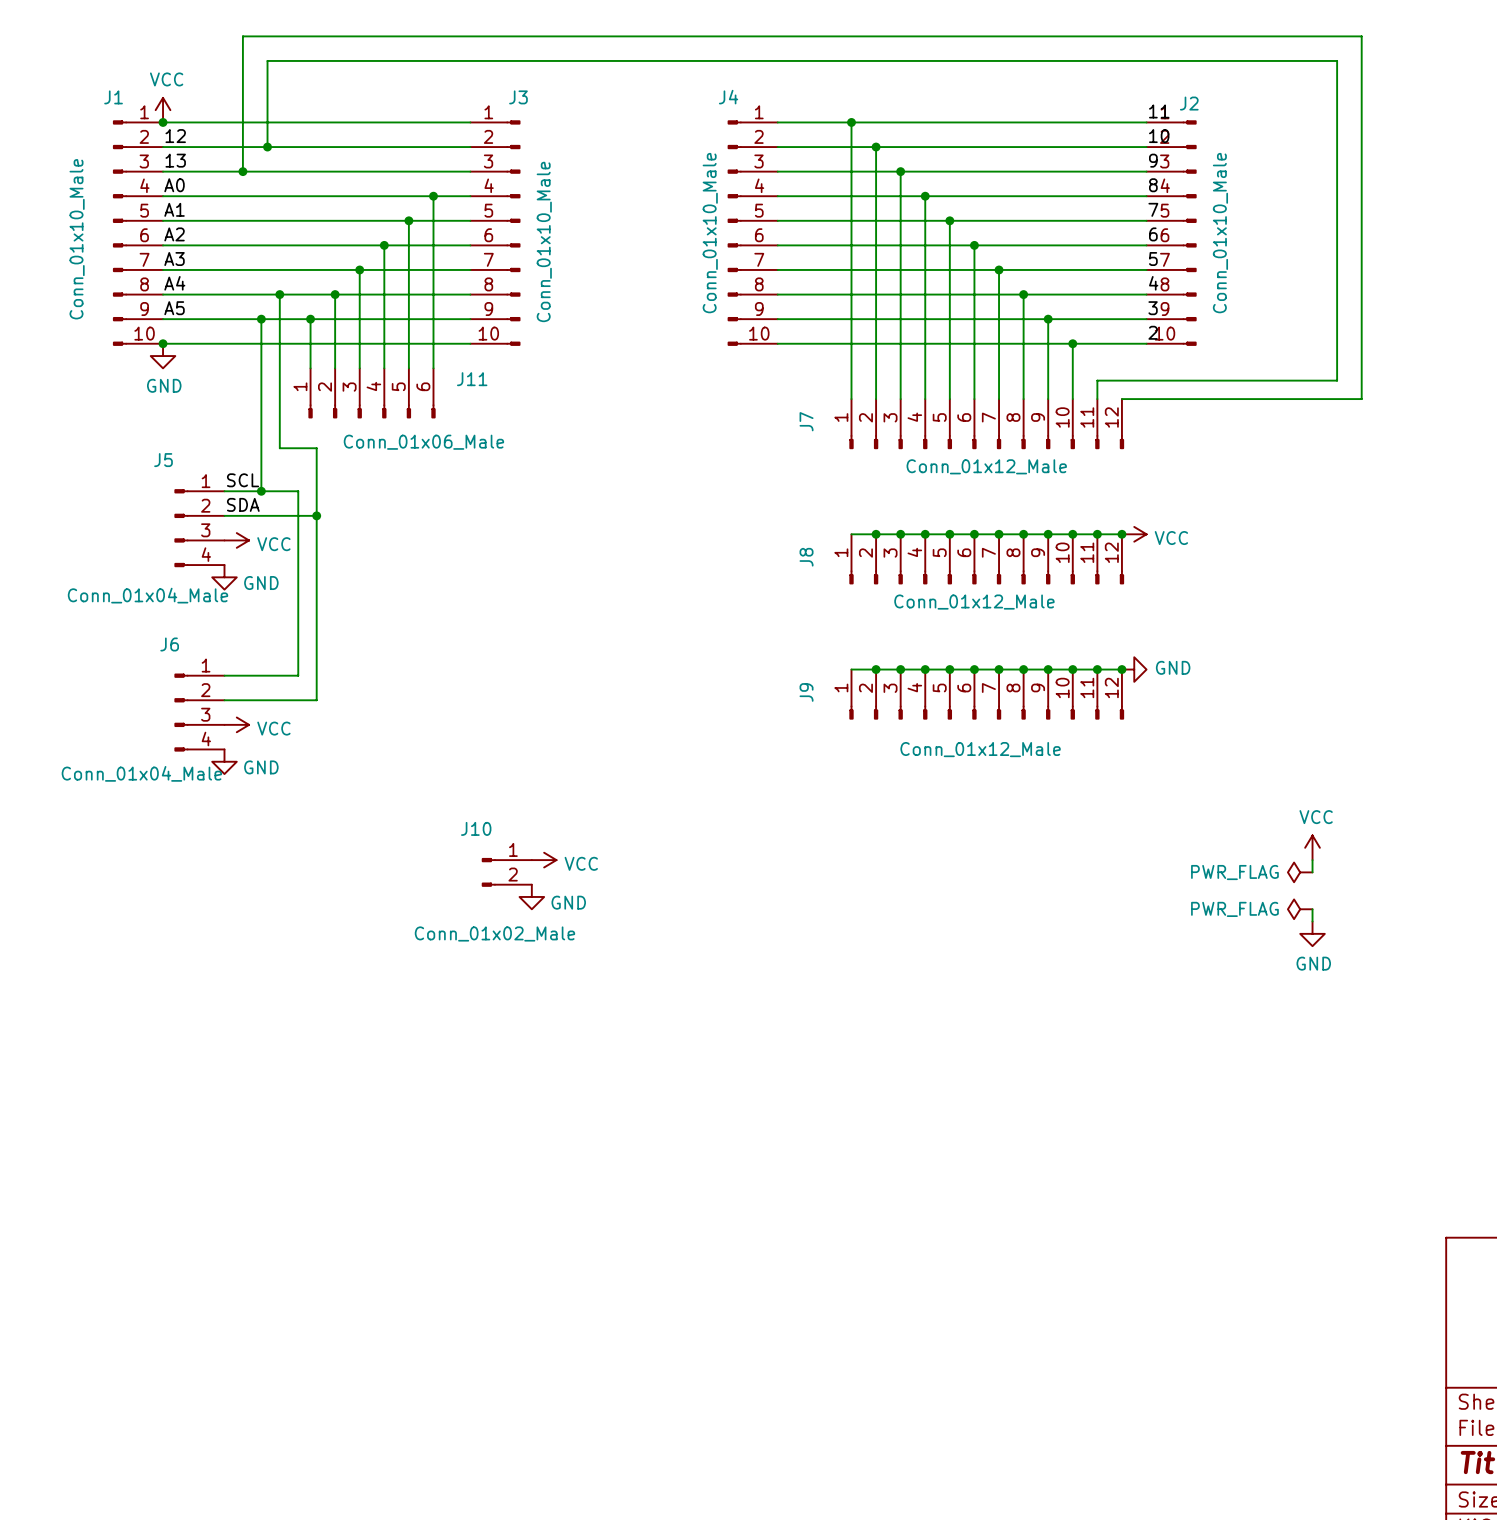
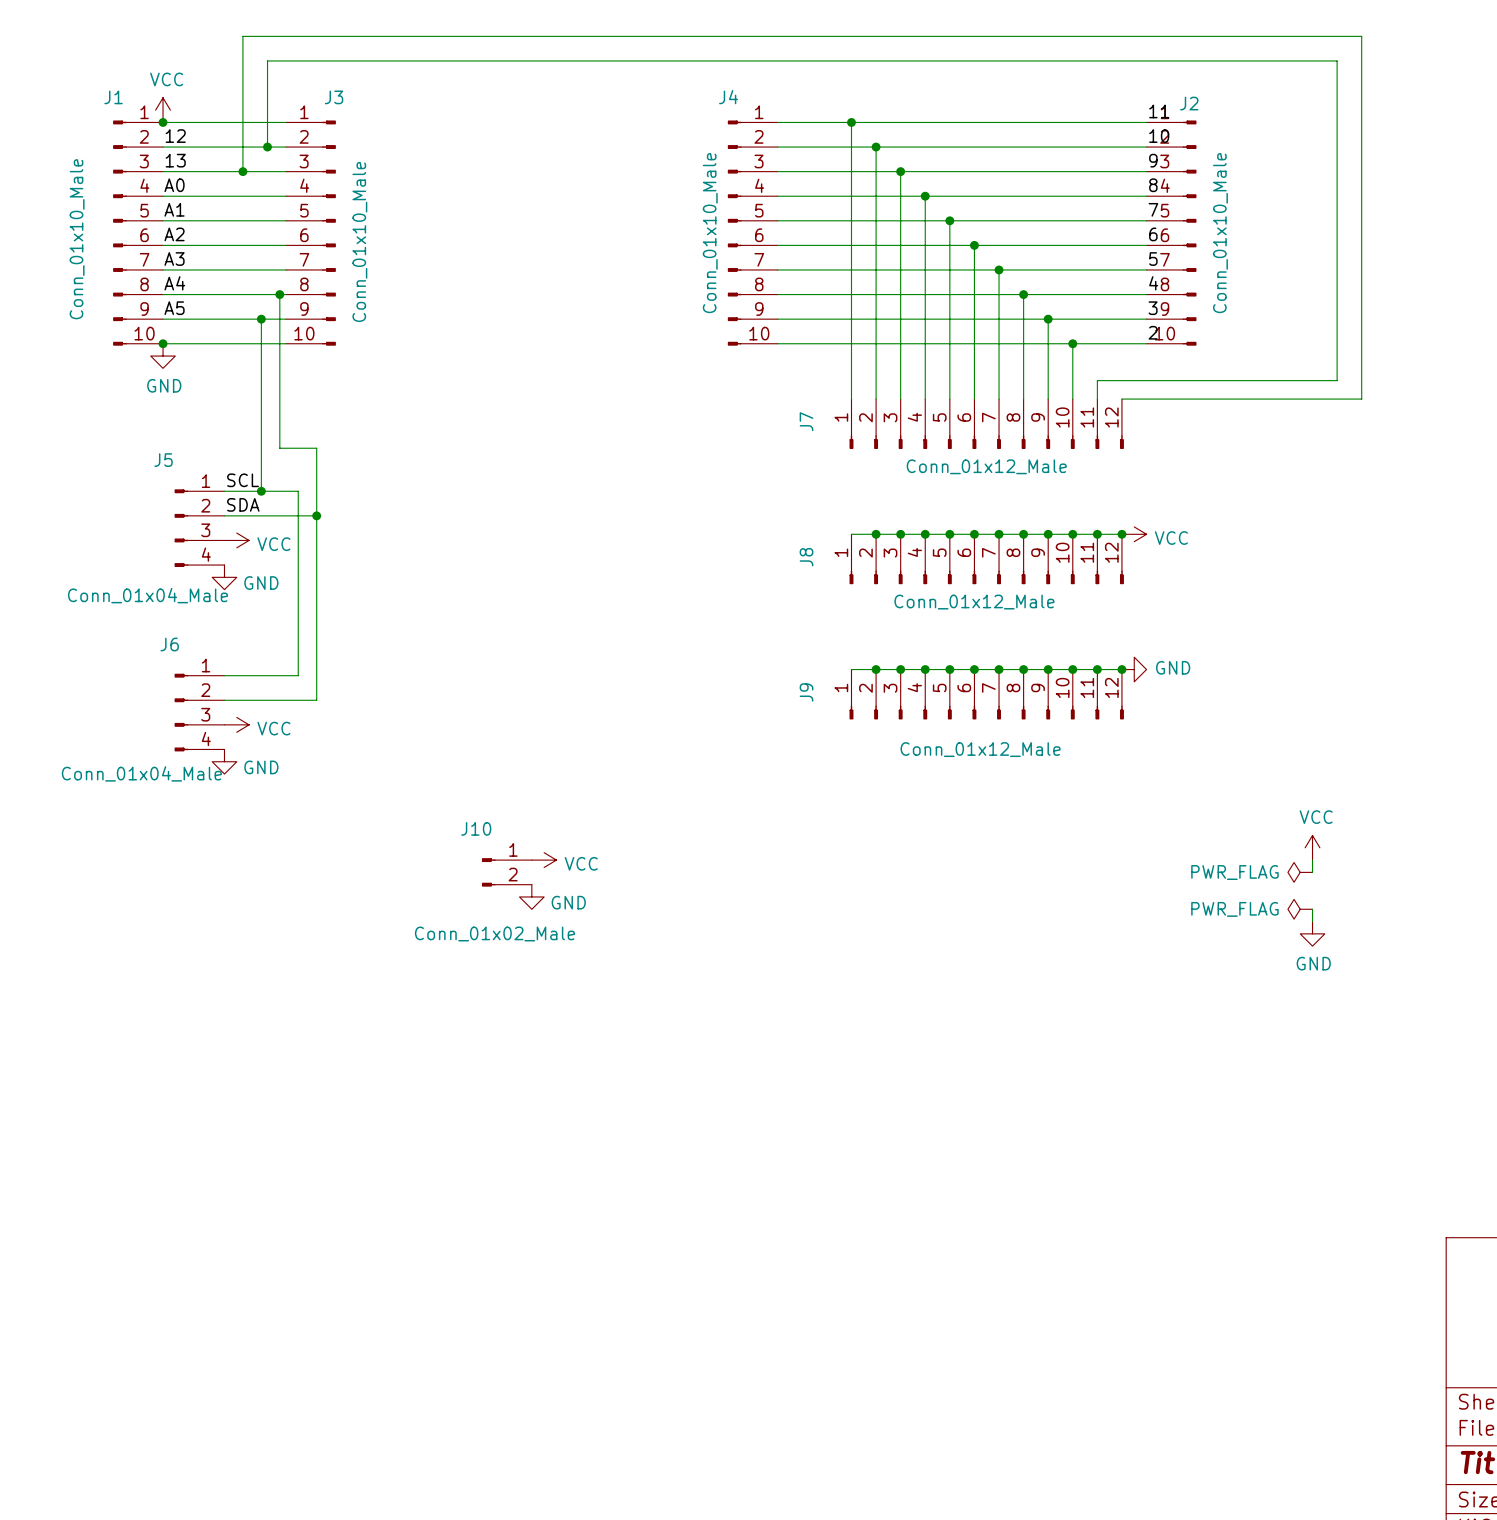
wire: (285, 122) (470, 122) -> none
wire: (285, 147) (470, 147) -> none
wire: (285, 171) (470, 171) -> none
wire: (285, 196) (470, 196) -> none
wire: (433, 196) (433, 368) -> none
junction: (433, 196) -> none
wire: (285, 220) (470, 220) -> none
wire: (408, 220) (408, 368) -> none
junction: (408, 220) -> none
J3 position: (495, 233) -> (310, 233)
wire: (285, 245) (470, 245) -> none
wire: (384, 245) (384, 368) -> none
junction: (384, 245) -> none
wire: (285, 269) (470, 269) -> none
wire: (359, 269) (359, 368) -> none
junction: (359, 269) -> none
wire: (285, 294) (470, 294) -> none
wire: (335, 294) (335, 368) -> none
junction: (335, 294) -> none
wire: (285, 319) (470, 319) -> none
wire: (310, 319) (310, 368) -> none
junction: (310, 319) -> none
wire: (285, 343) (470, 343) -> none
J11: Conn_01x06_Male (372, 393) -> none

